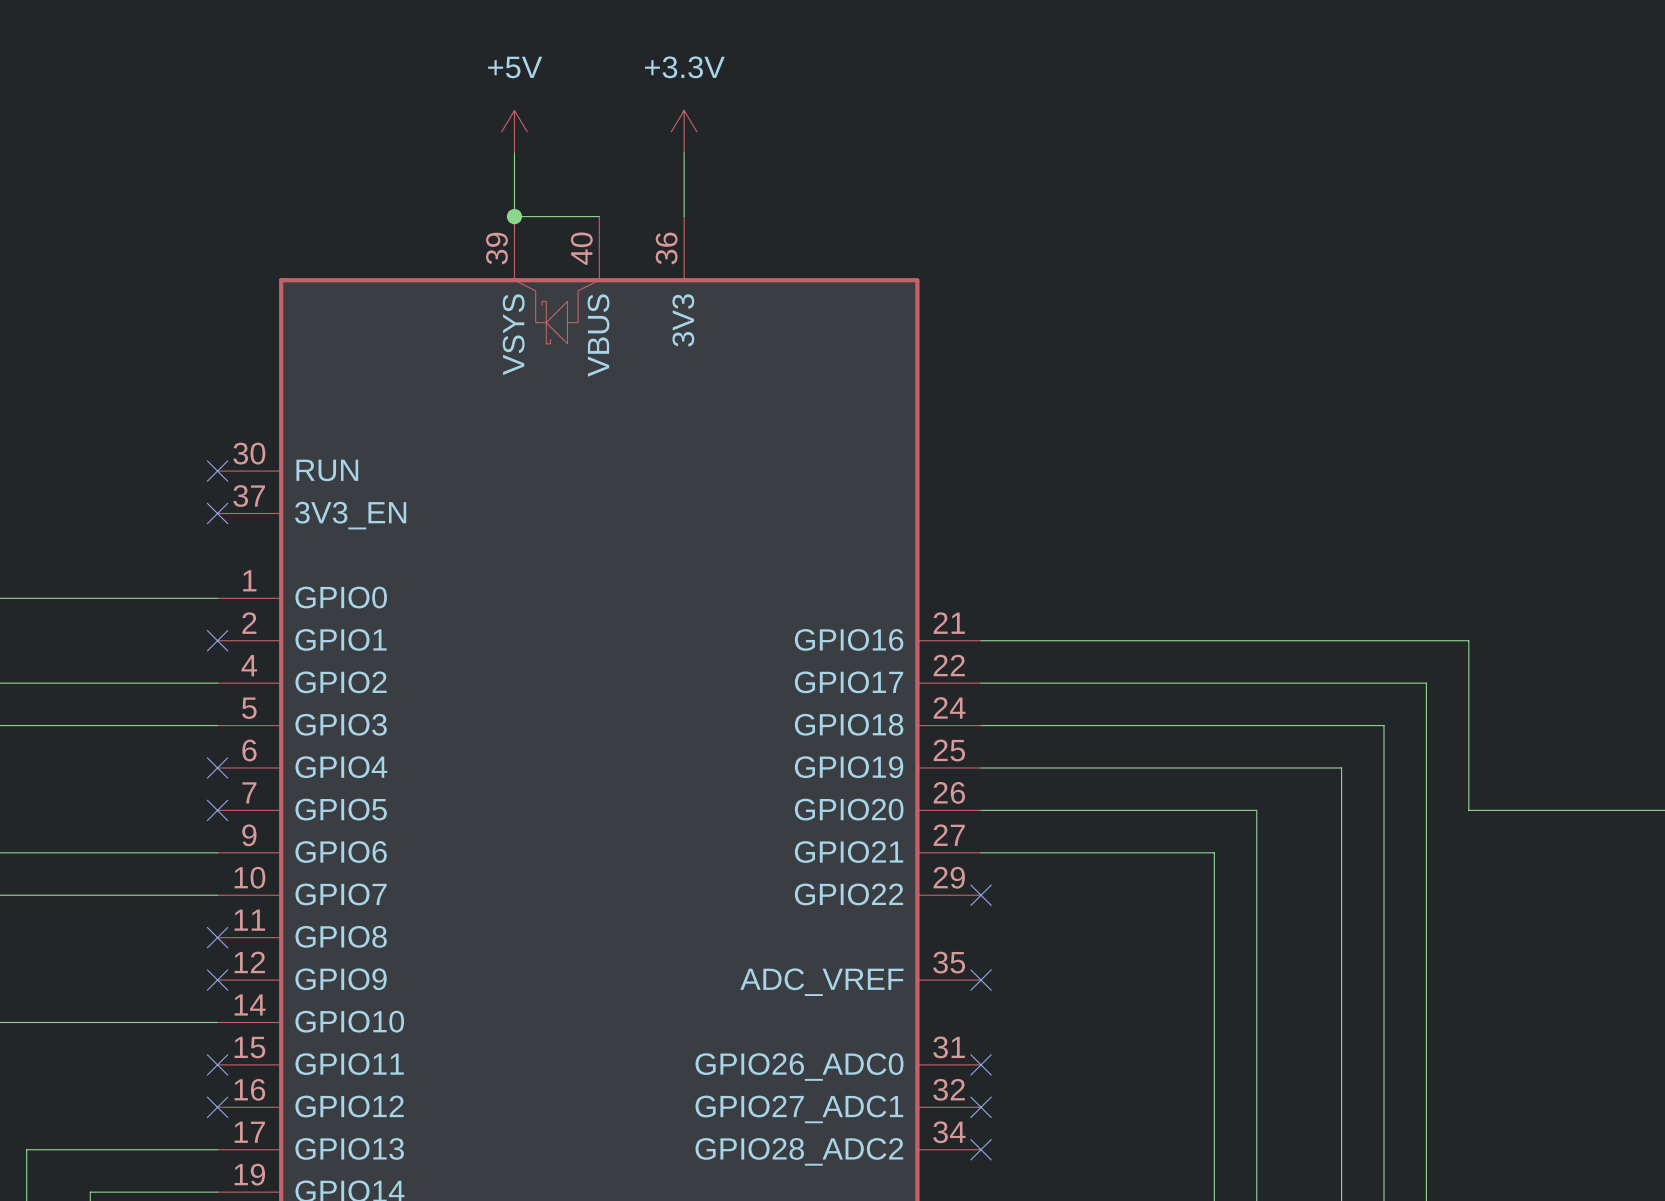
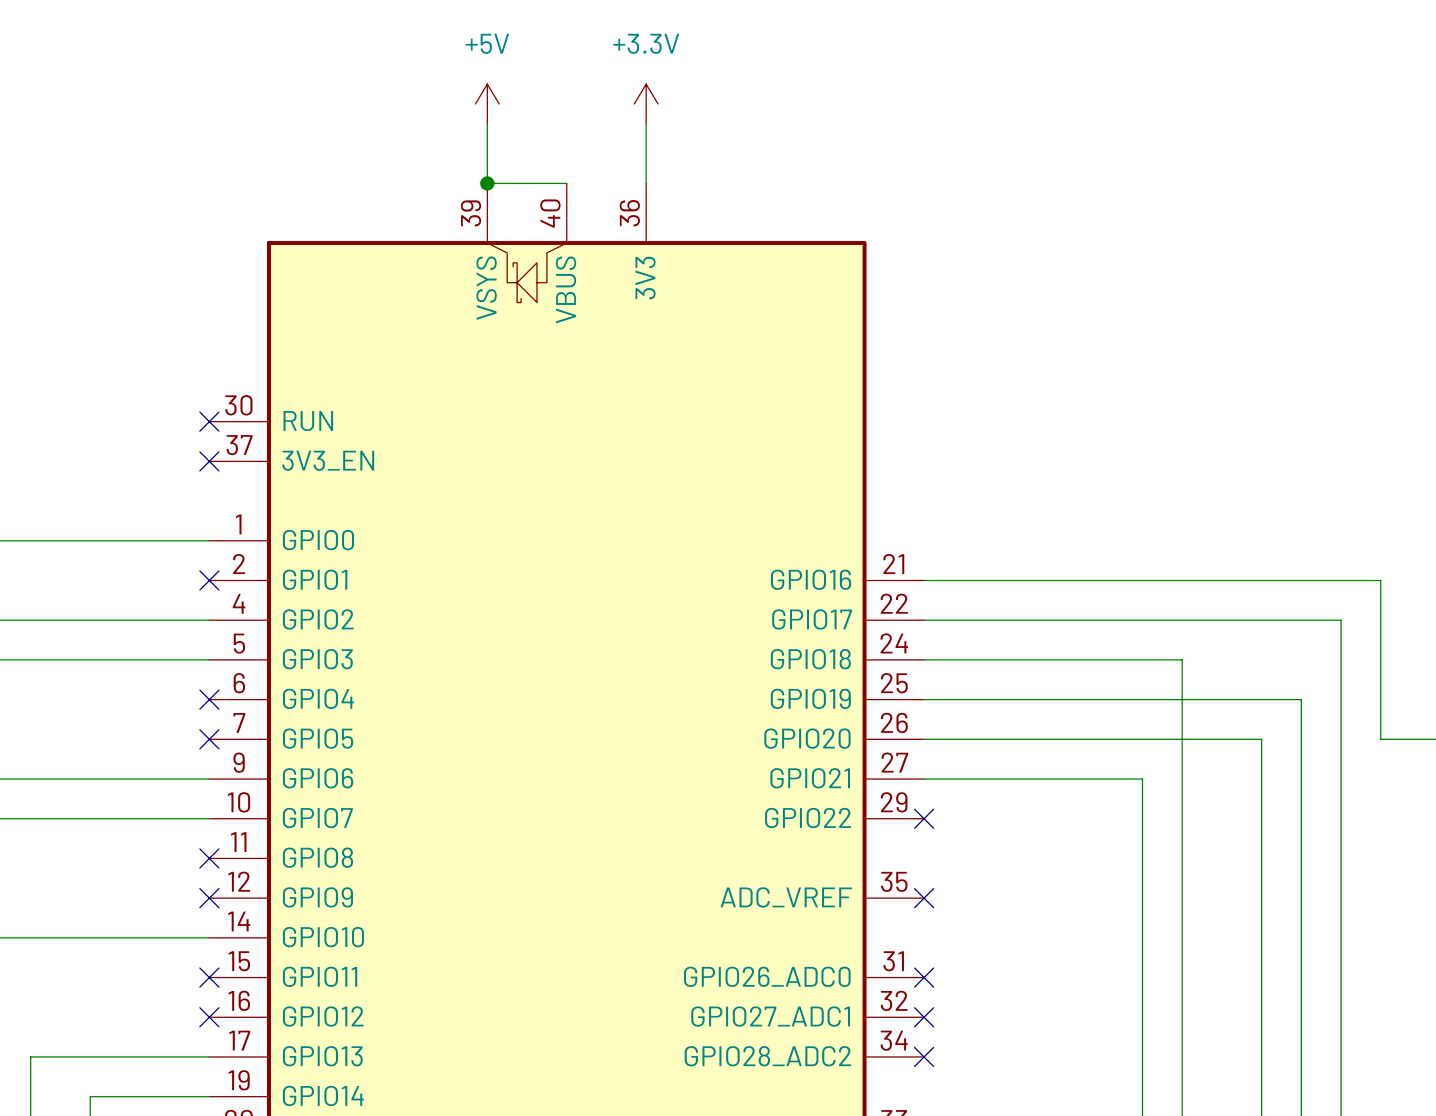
wire: (1256, 725) (1384, 725) (1384, 767) -> (1182, 659) (1182, 739) (1261, 739)
wire: (1341, 767) (1341, 810) -> (1261, 699) (1301, 699)

